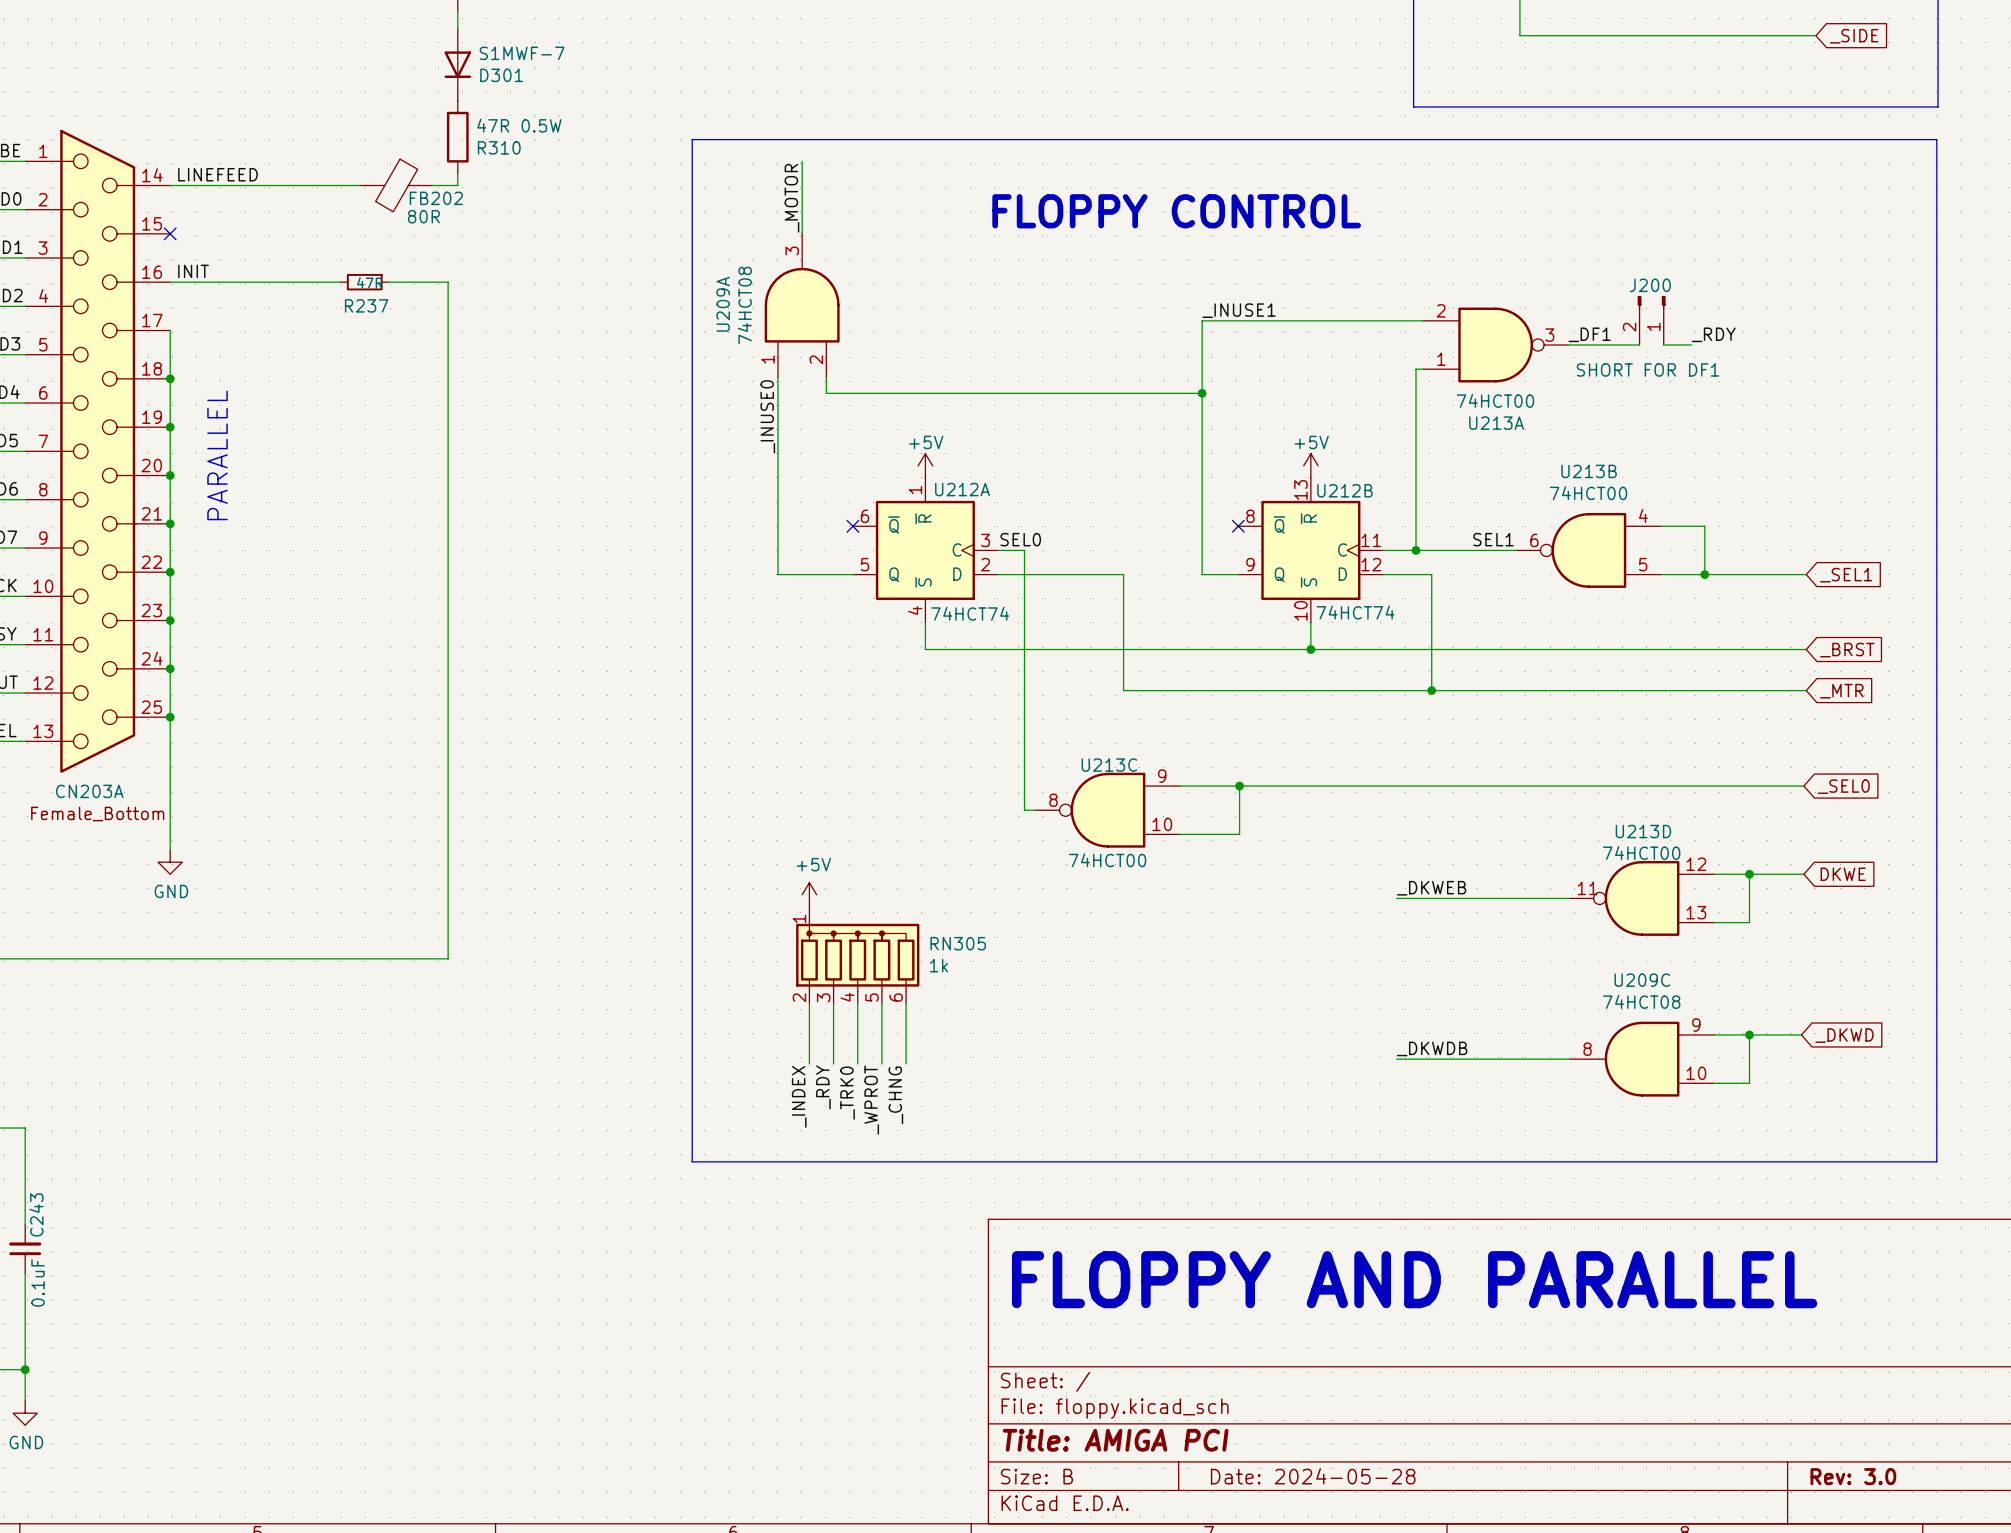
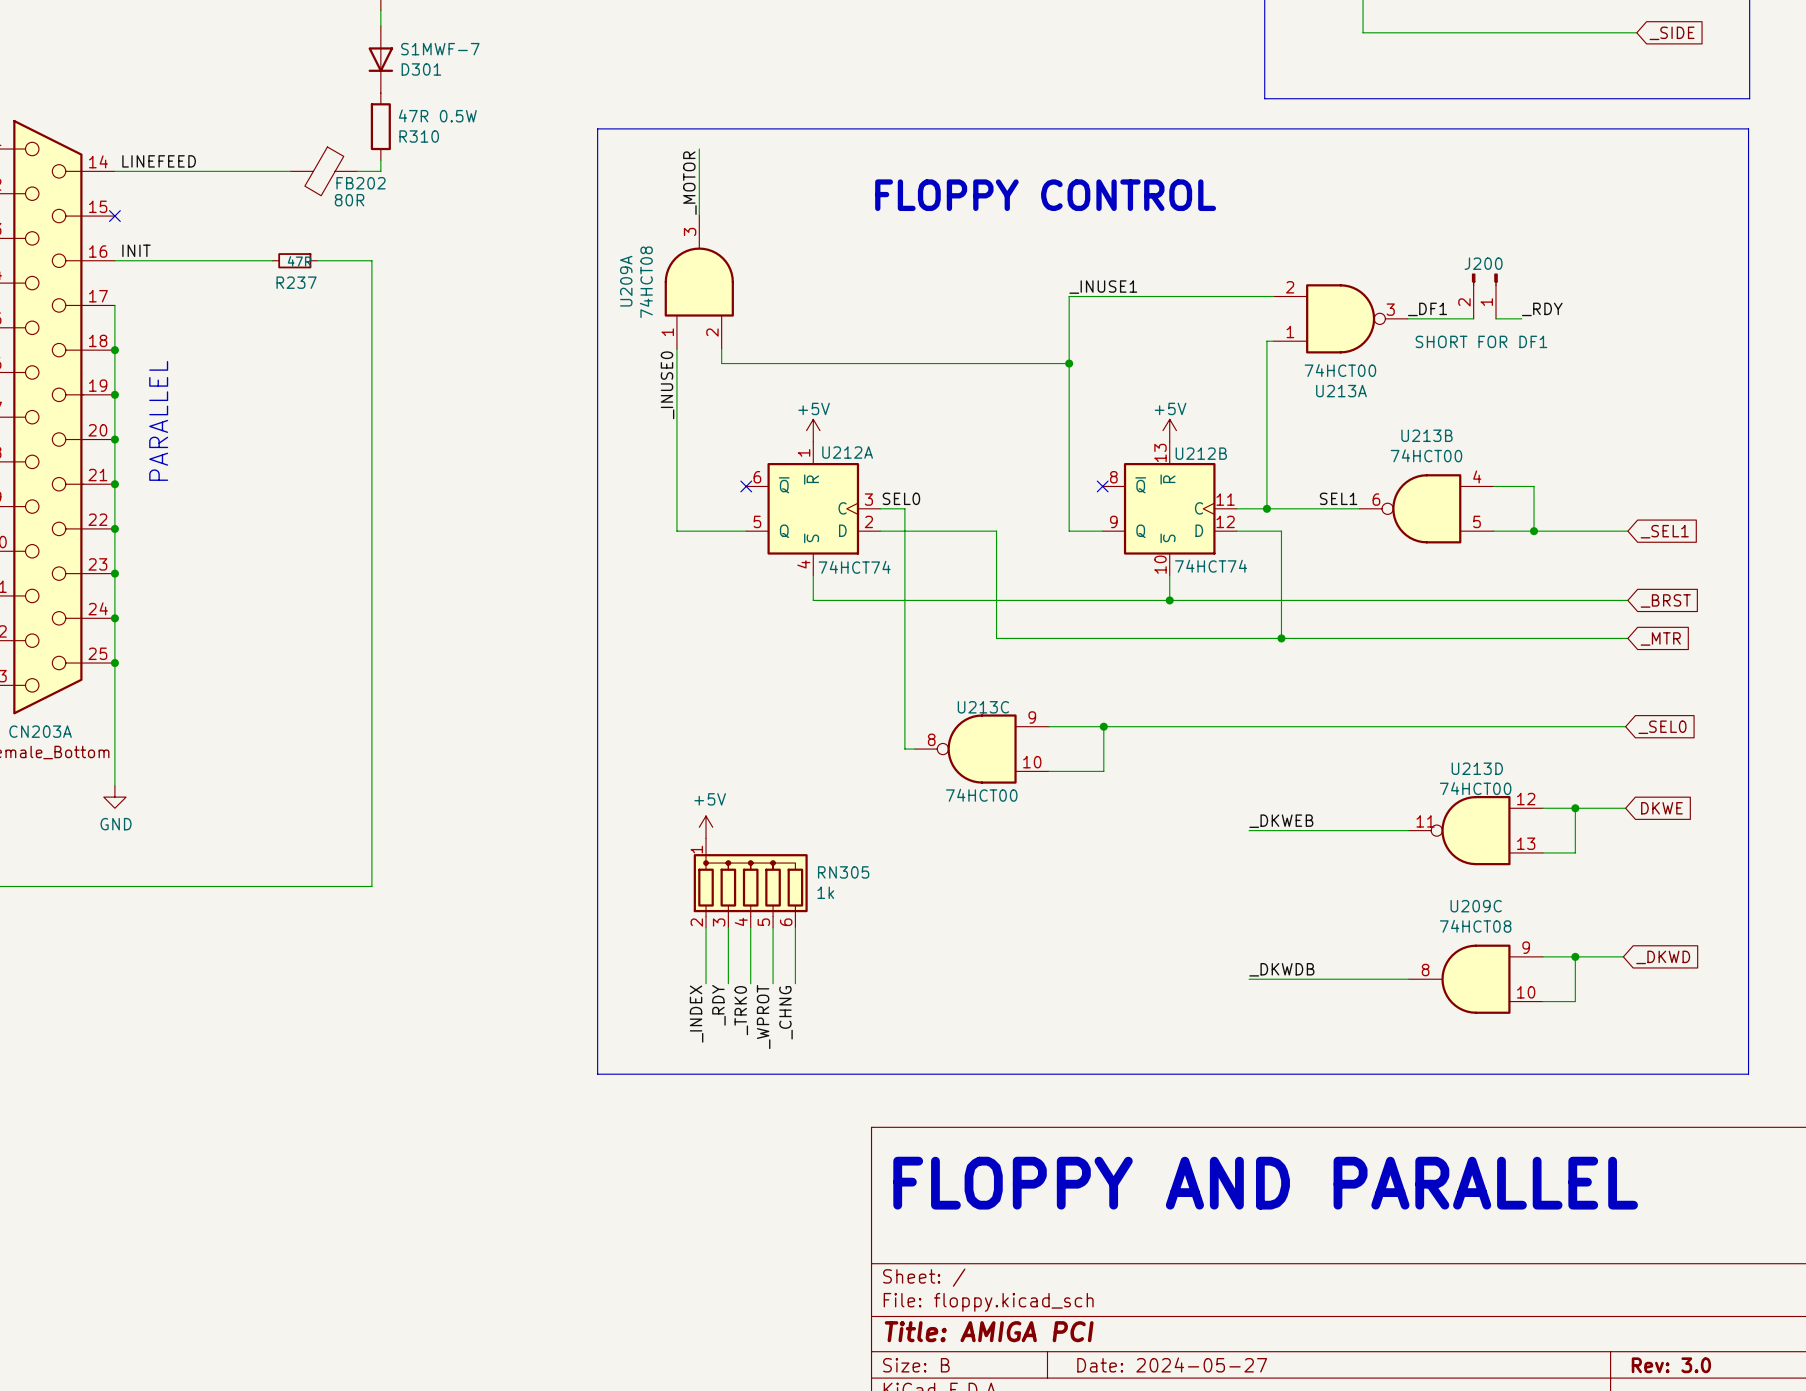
title block: Date: 2024-05-28 (1313, 1476) -> Date: 2024-05-27 (1172, 1364)

